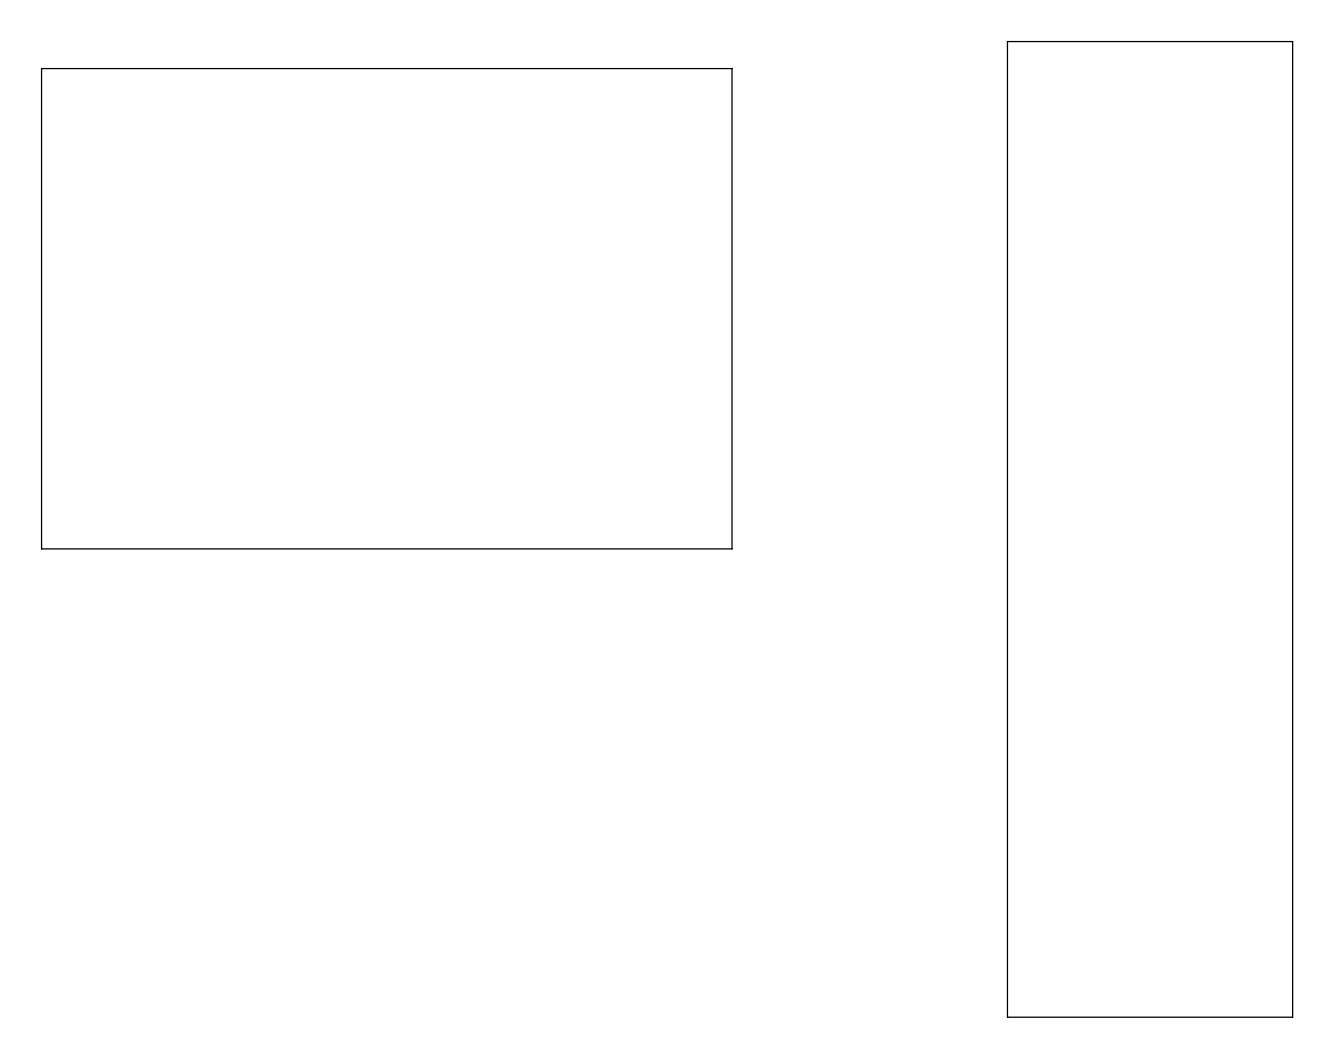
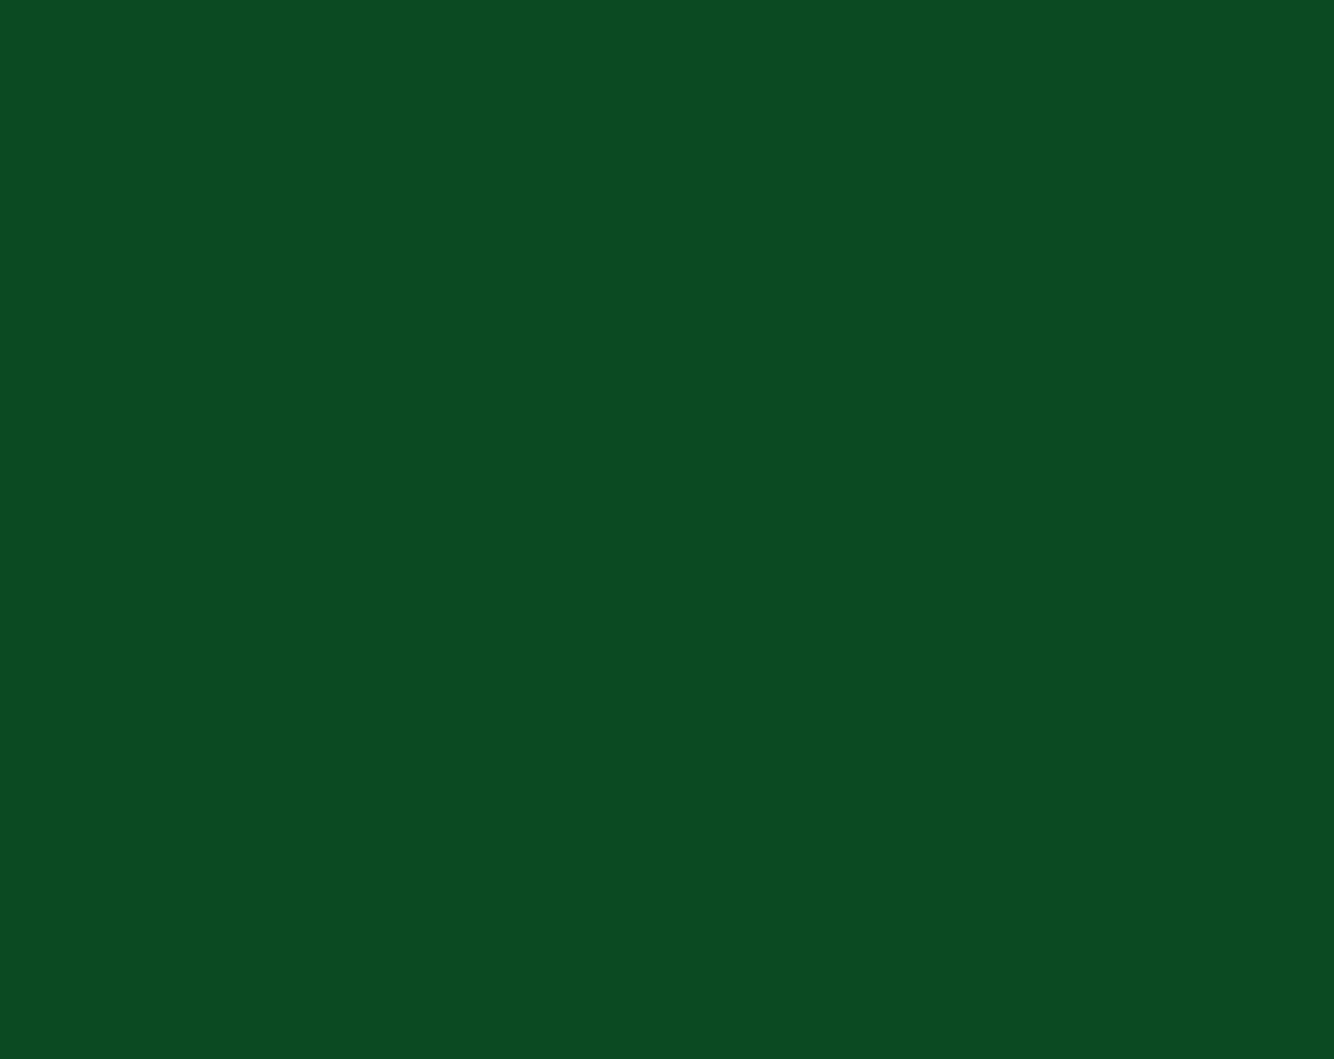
board edge: (1292, 41) (1007, 41) (1007, 1017) (1292, 1017) (1292, 41) -> none
board edge: (732, 68) (41, 68) (41, 548) (732, 548) (732, 68) -> none

